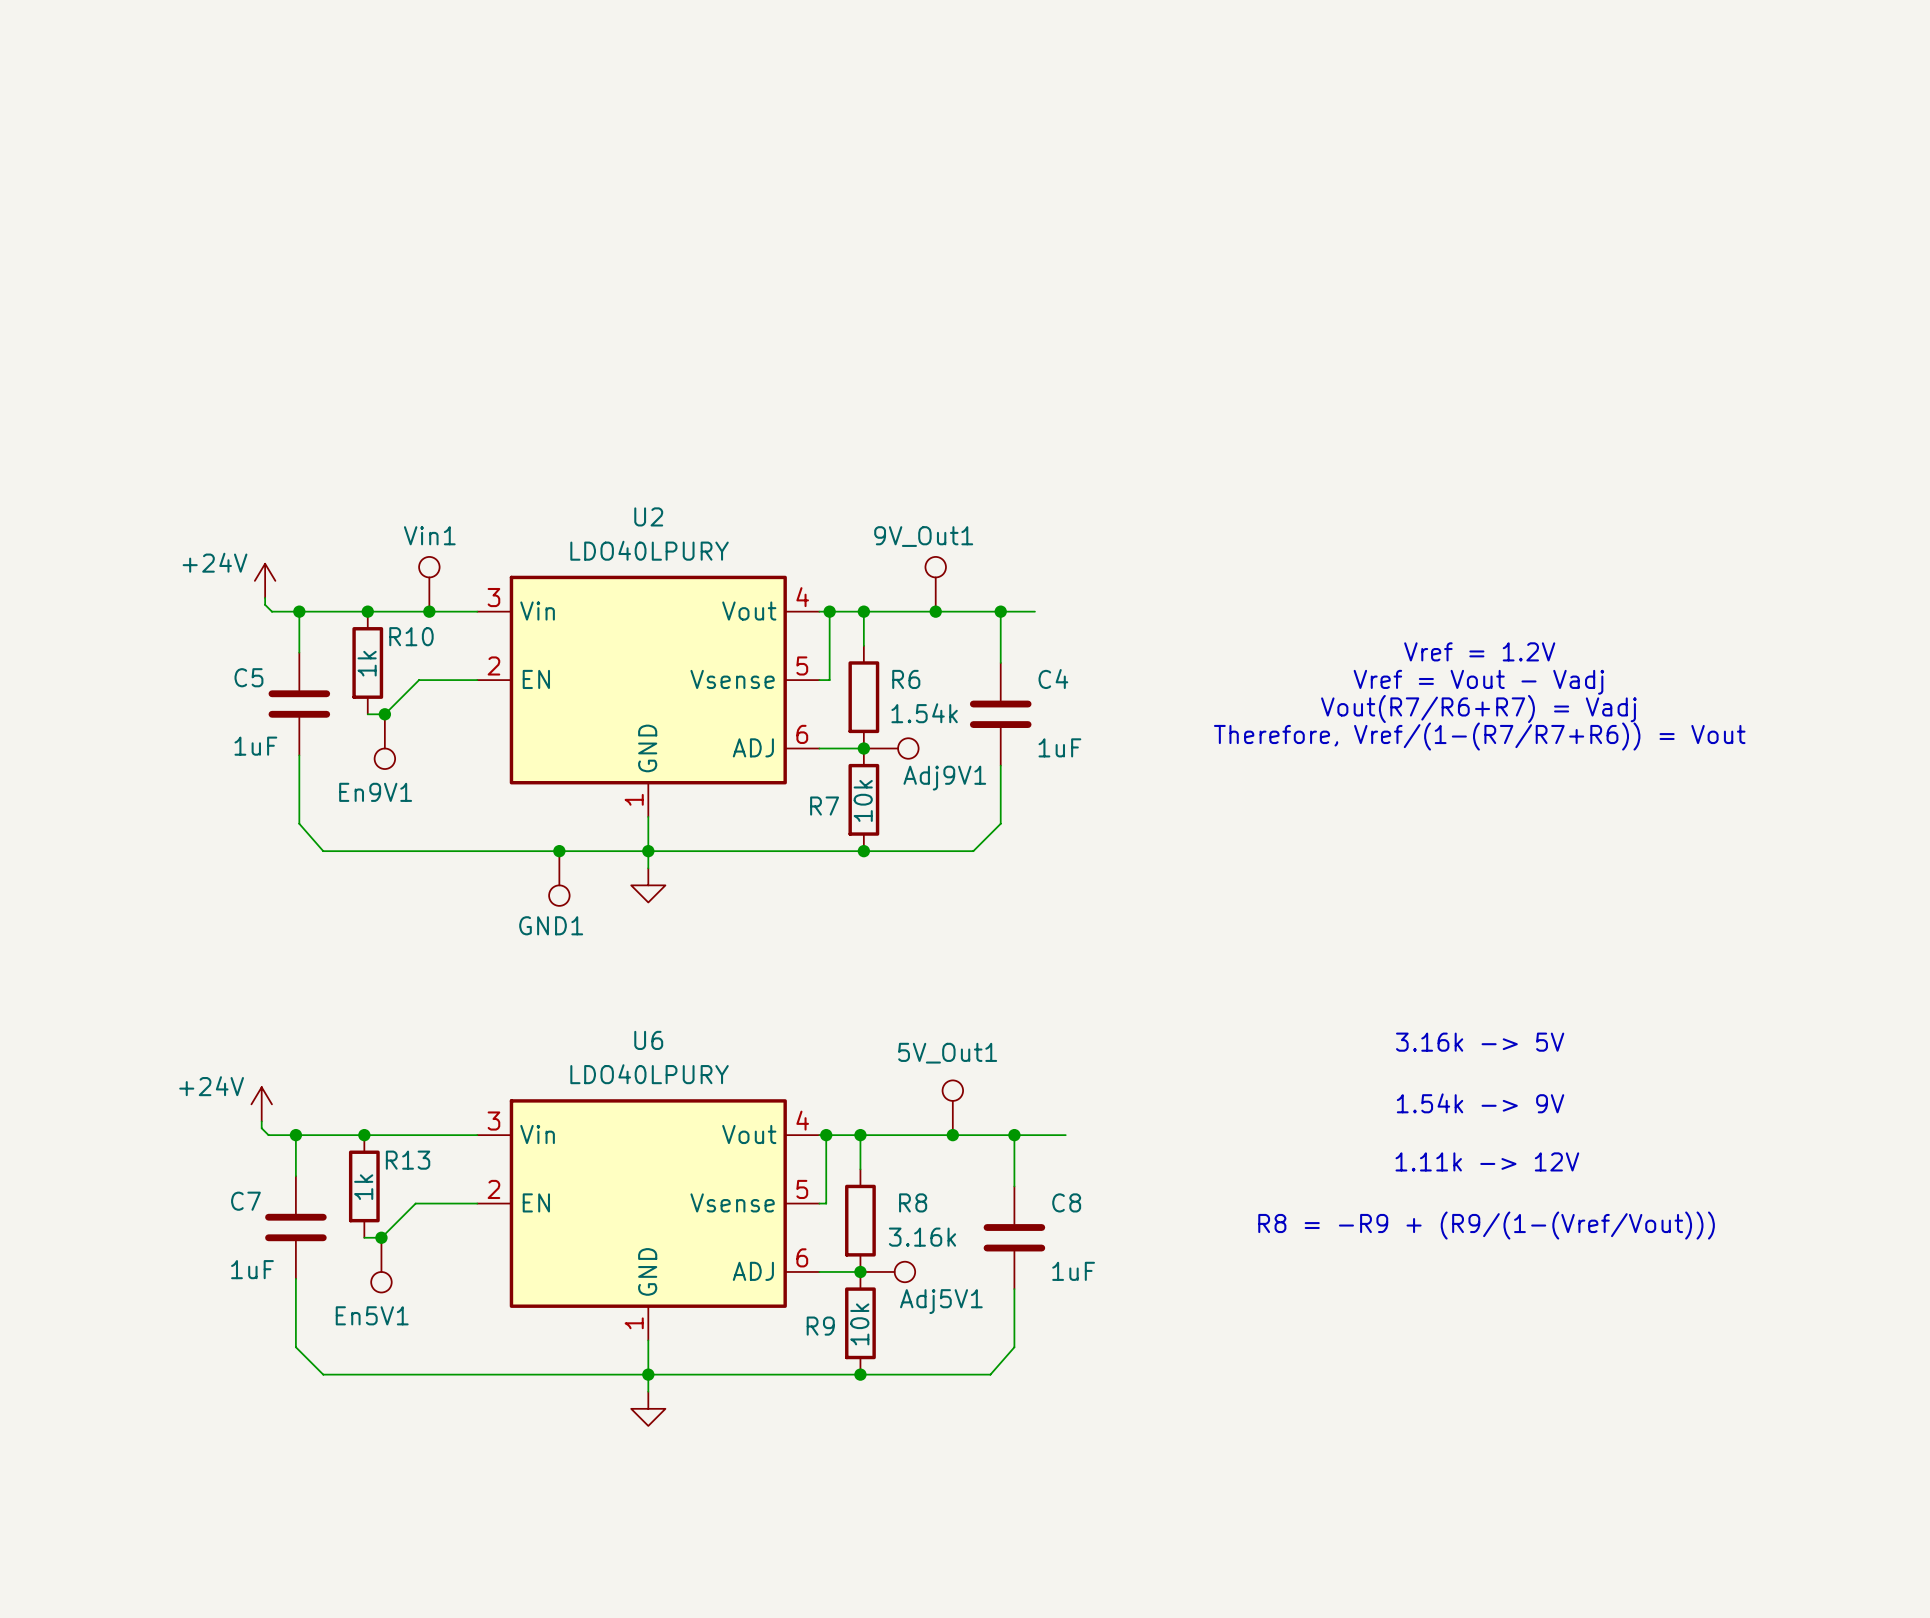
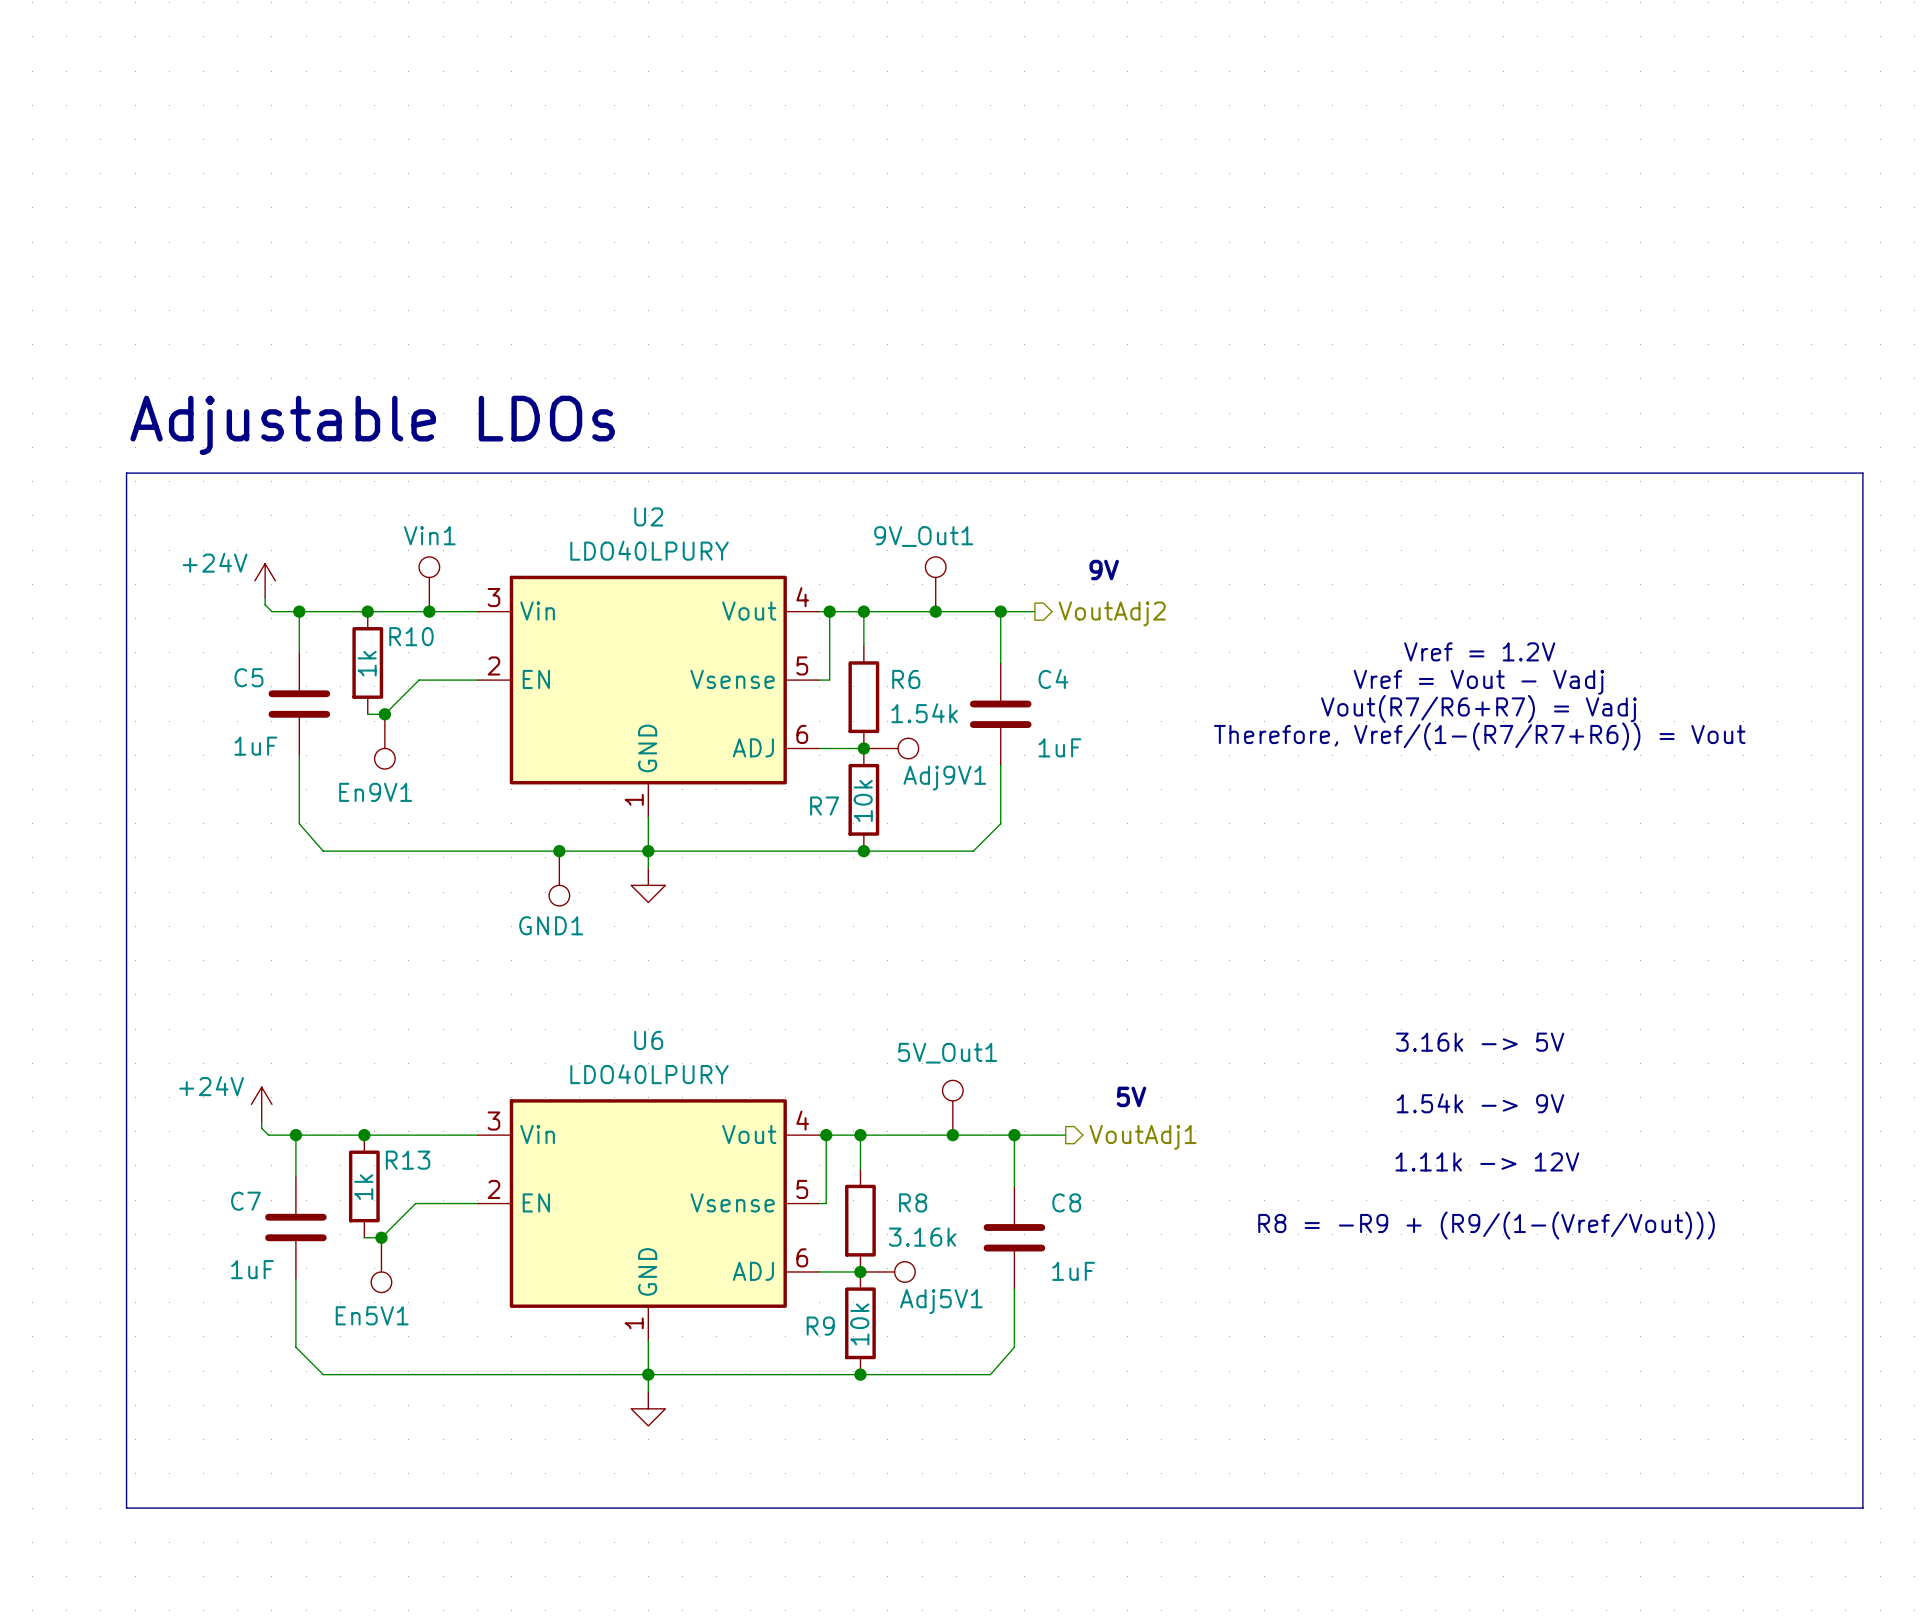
text: none -> Adjustable LDOs (372, 425)
line: none -> (126, 473) (1862, 473) (1862, 1508) (126, 1508) (126, 473)
text: none -> 9V (1104, 570)
hierarchical label: none -> VoutAdj2 (1112, 613)
text: none -> 5V (1131, 1096)
hierarchical label: none -> VoutAdj1 (1142, 1137)

